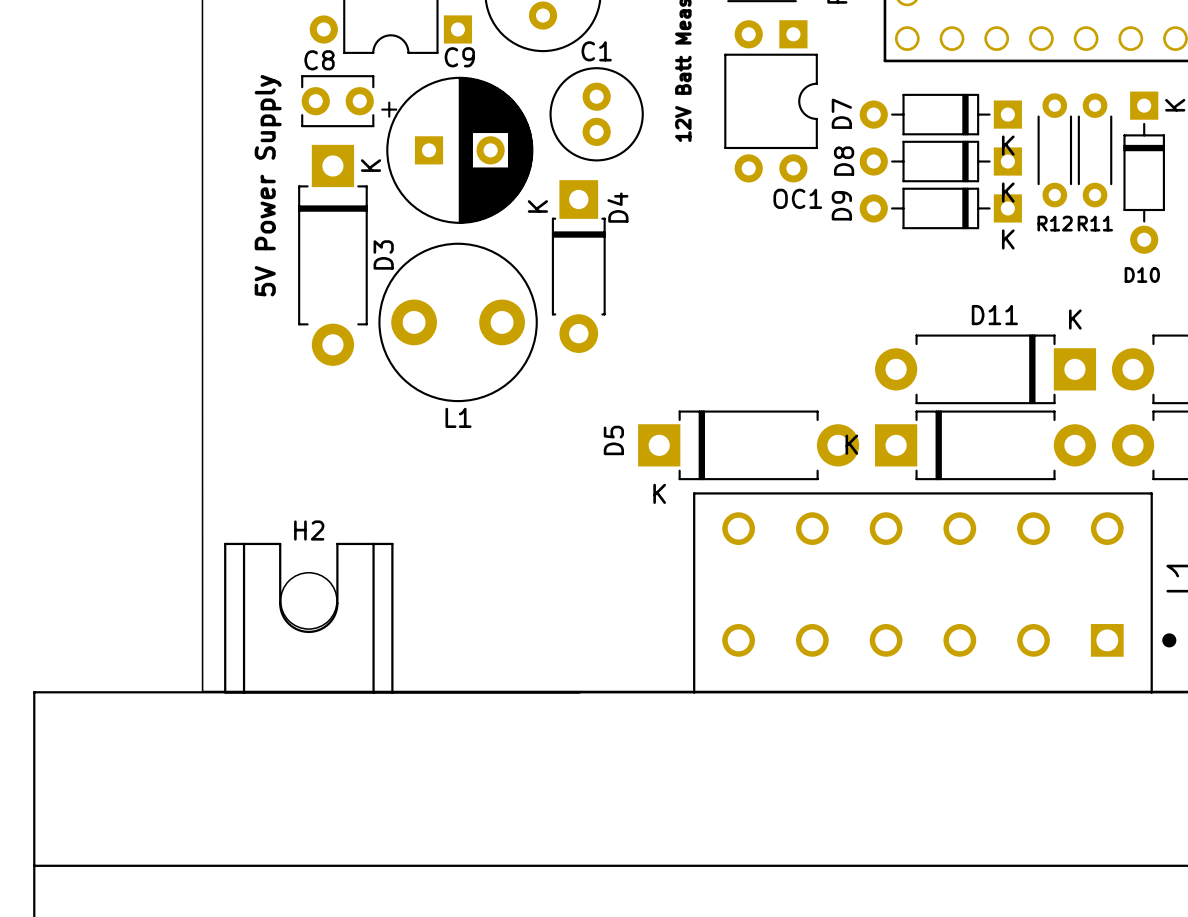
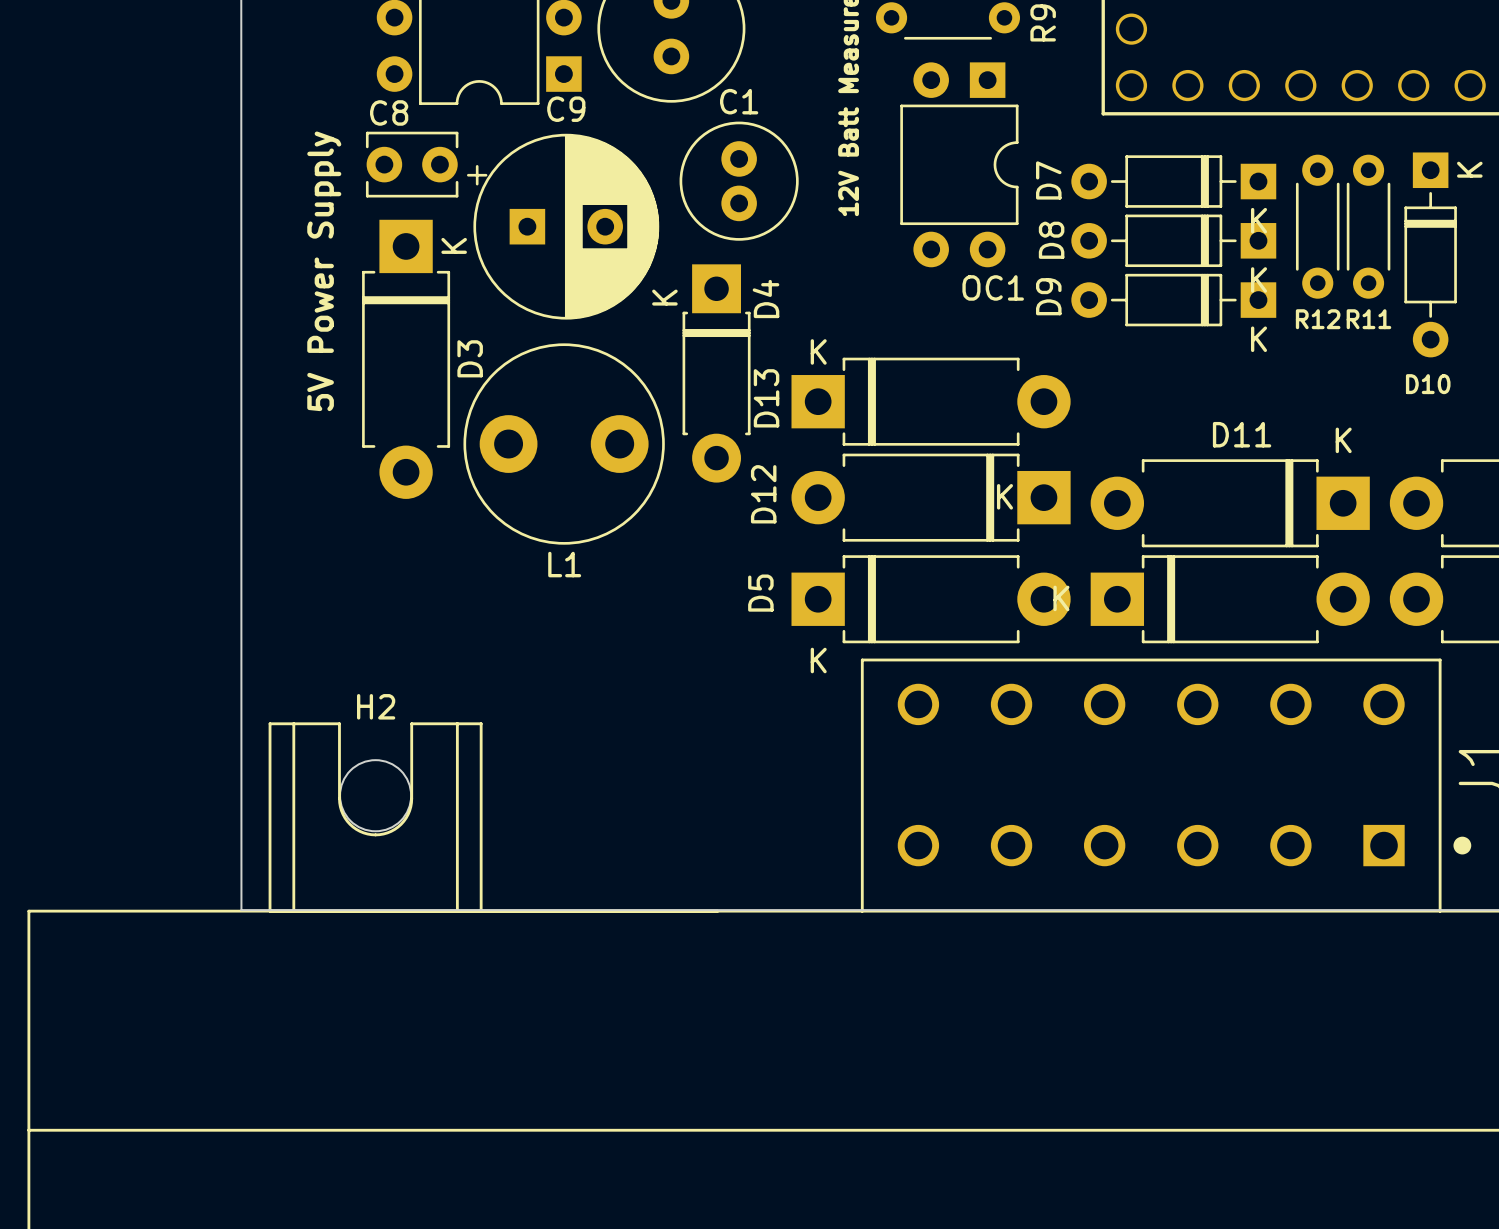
D13: none -> (931, 401)
D12: none -> (931, 497)

